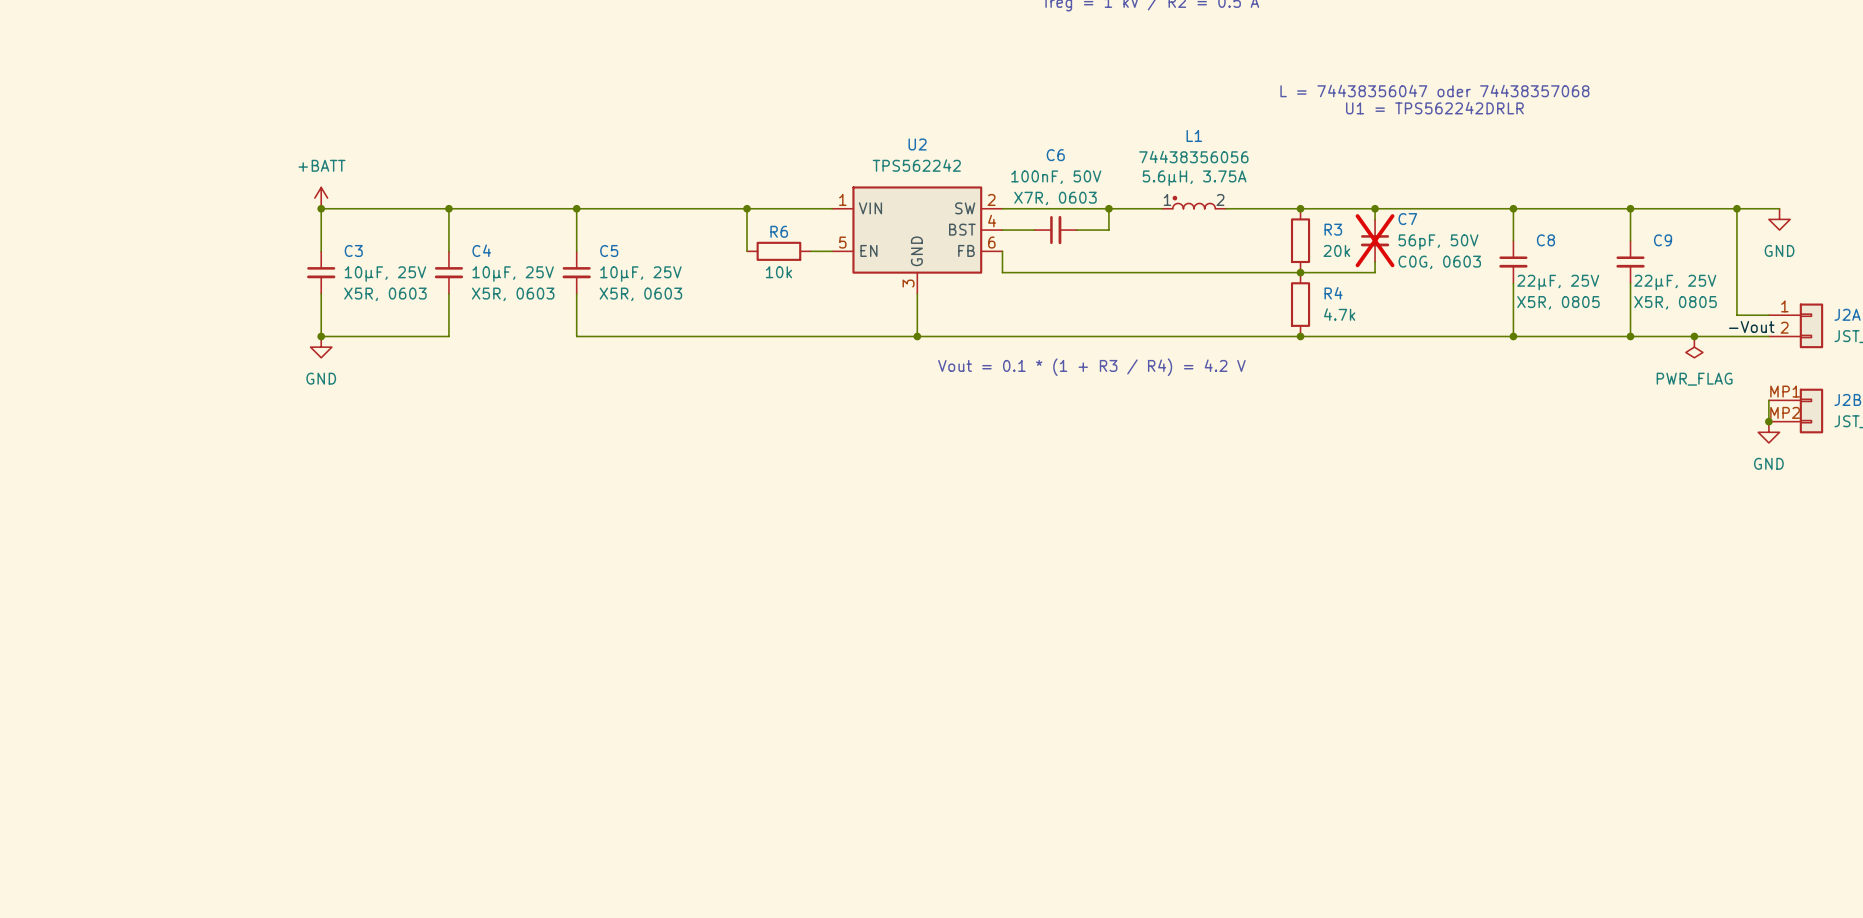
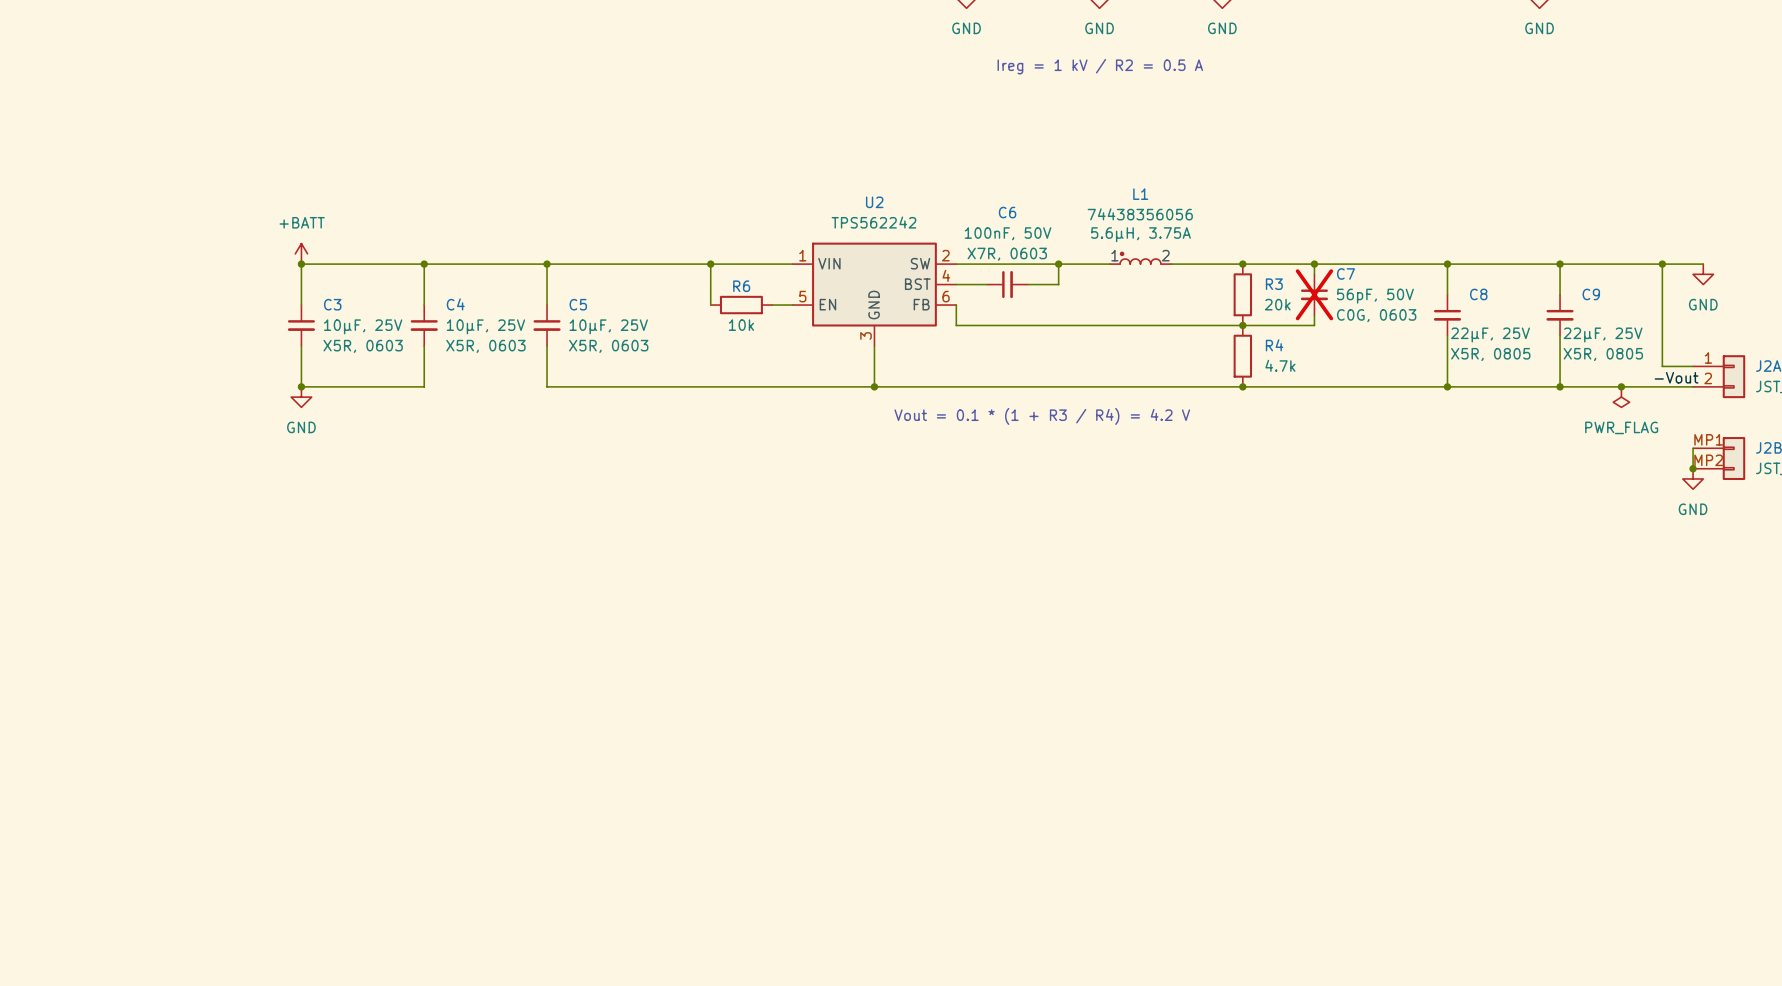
text: L = 74438356047 oder 74438357068 (1434, 91) -> none
text: U1 = TPS562242DRLR (1434, 108) -> none

